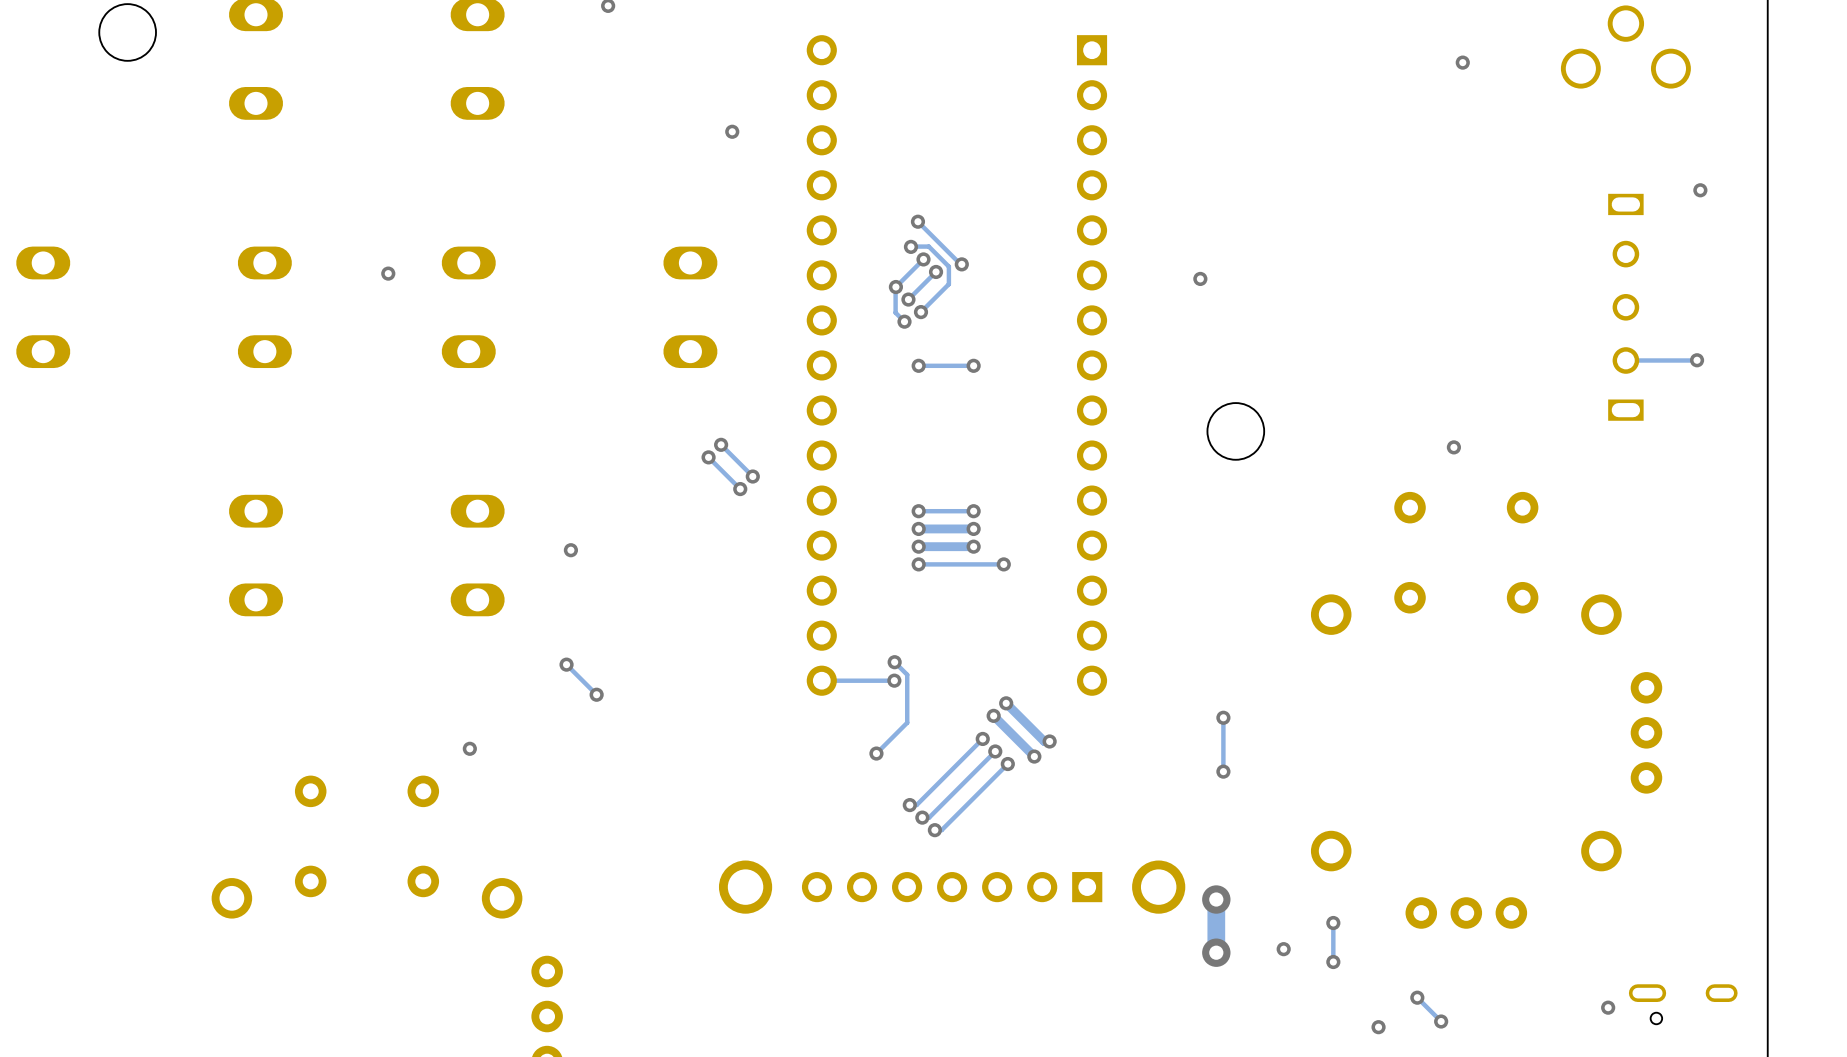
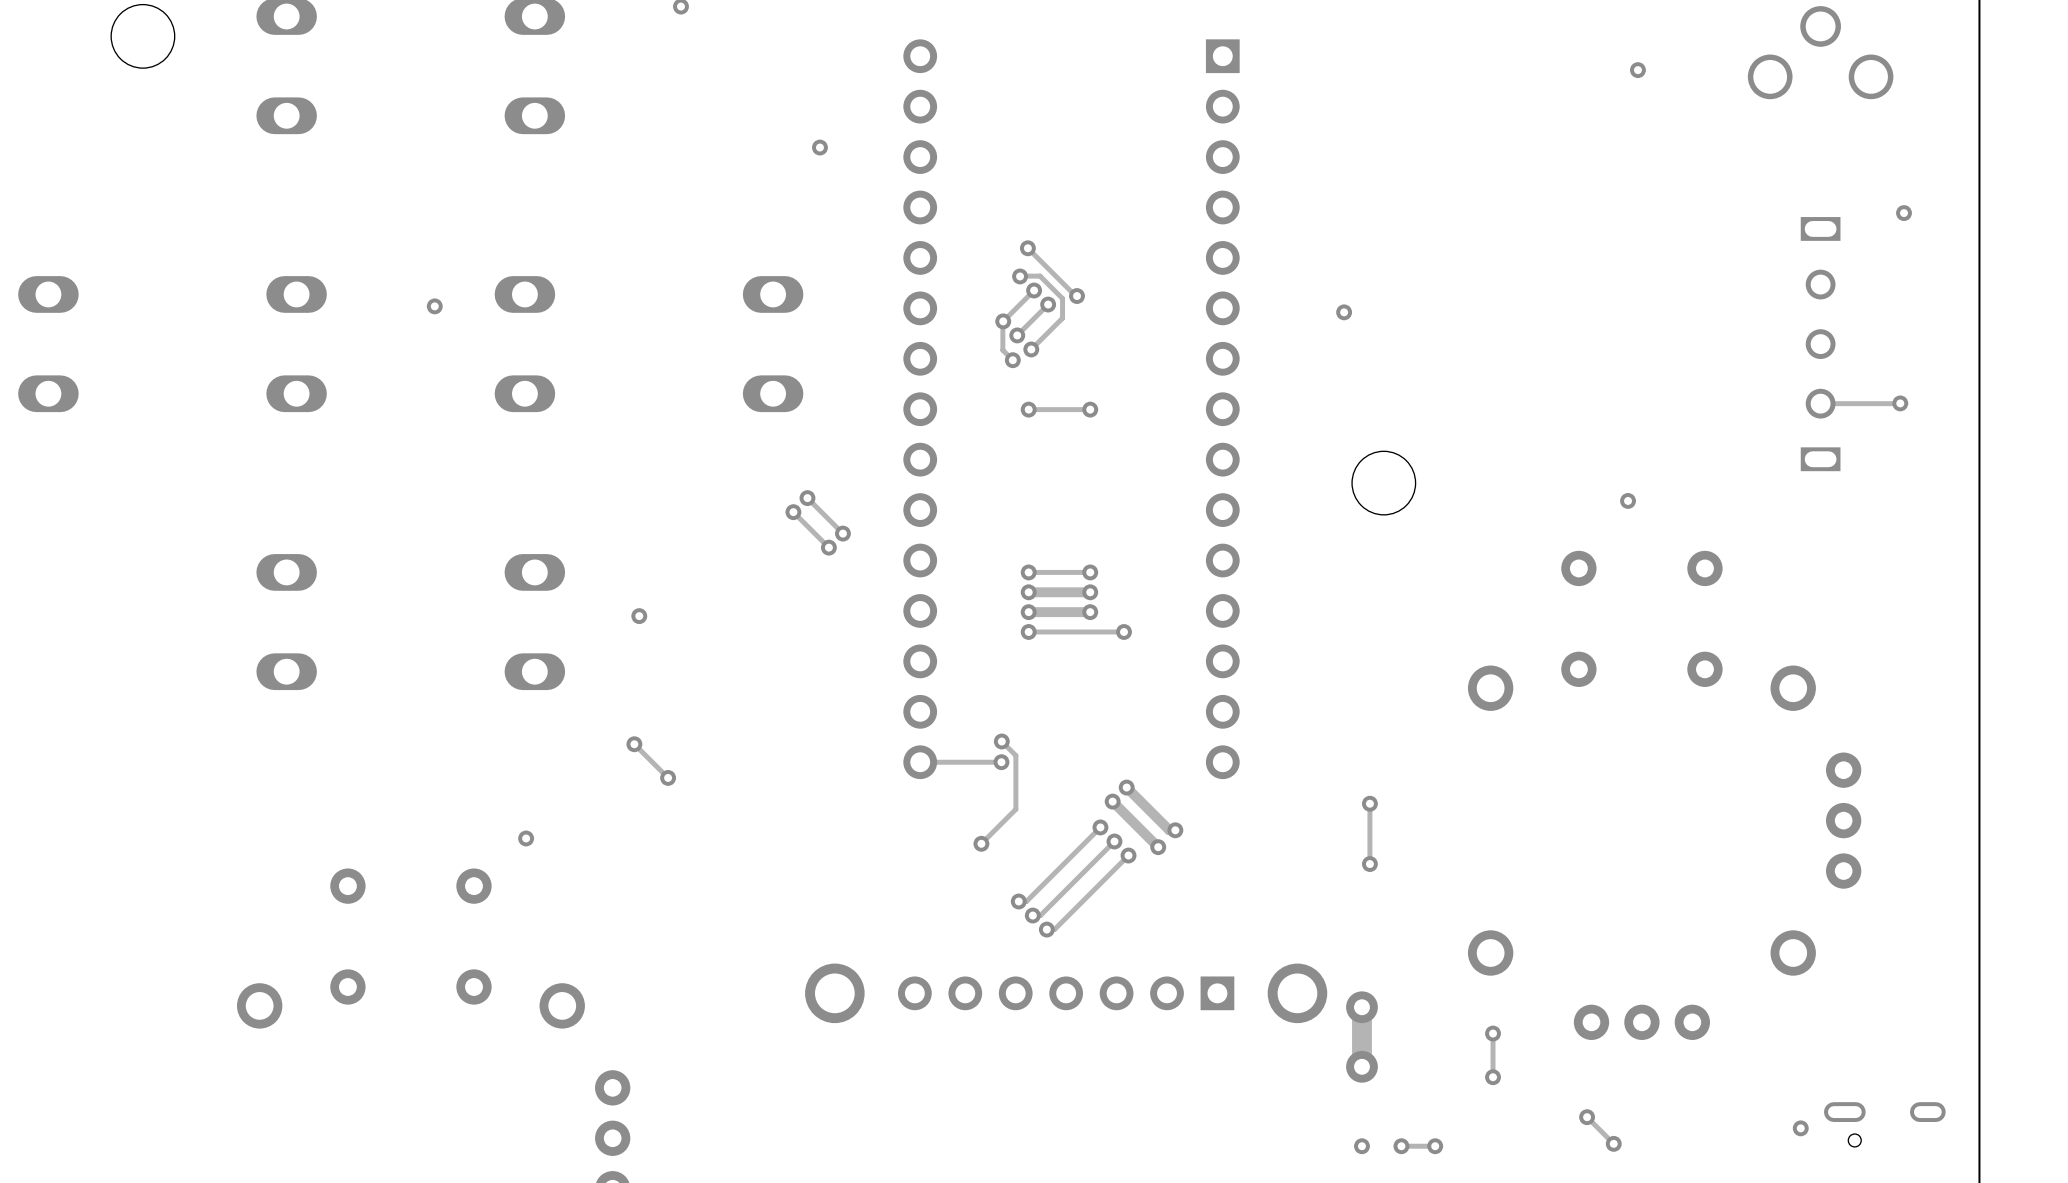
via: (1283, 949) -> none
via: none -> (1361, 1146)
via: none -> (1401, 1146)
track: none -> (1435, 1146) (1401, 1146)
via: none -> (1435, 1146)
via: (1378, 1027) -> none

